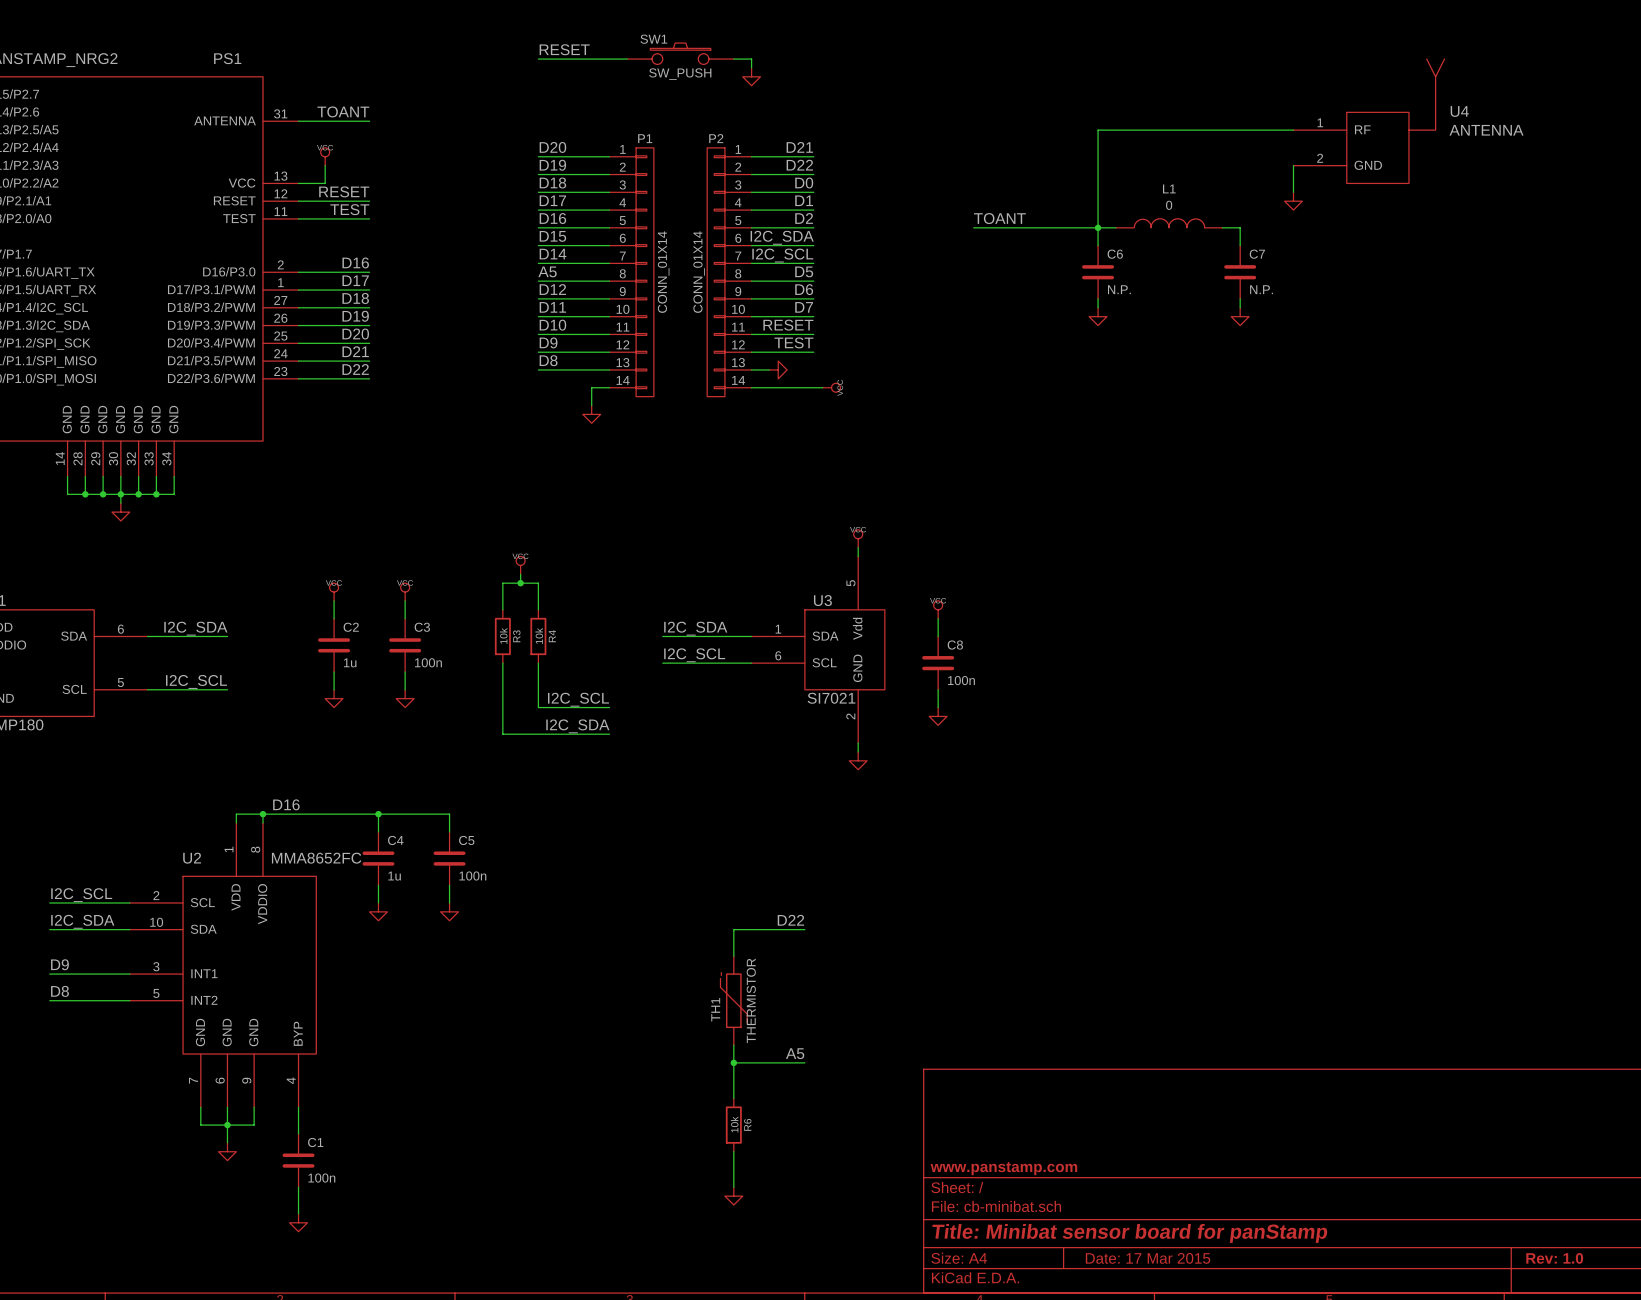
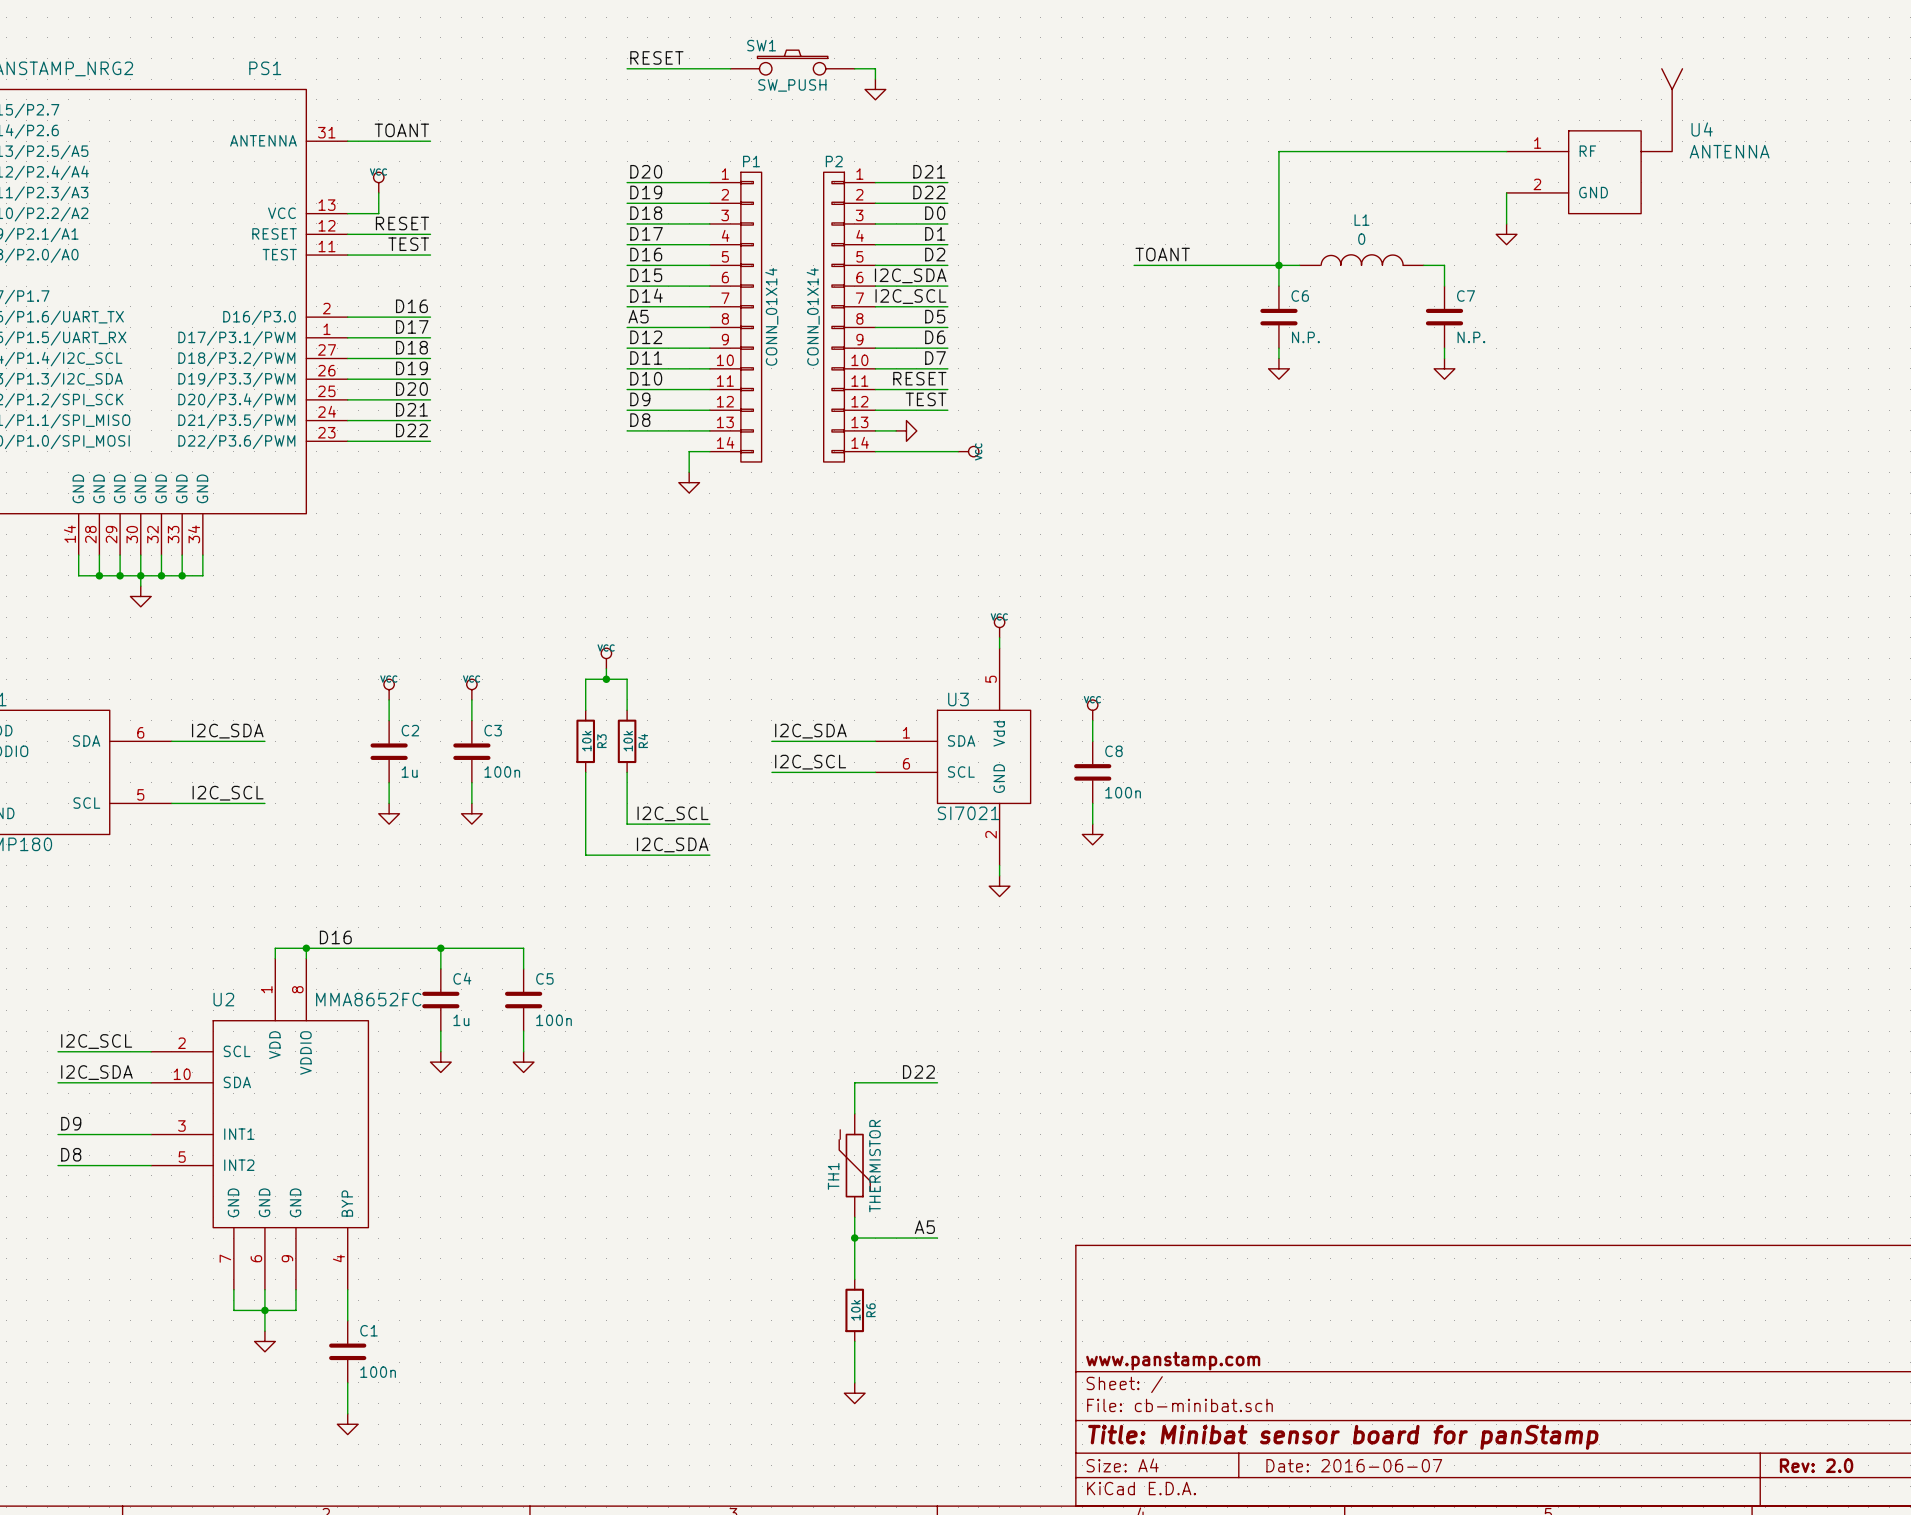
title block: Date: 17 Mar 2015 (1148, 1258) -> Date: 2016-06-07 (1354, 1465)
title block: Rev: 1.0 (1554, 1258) -> Rev: 2.0 (1816, 1465)

